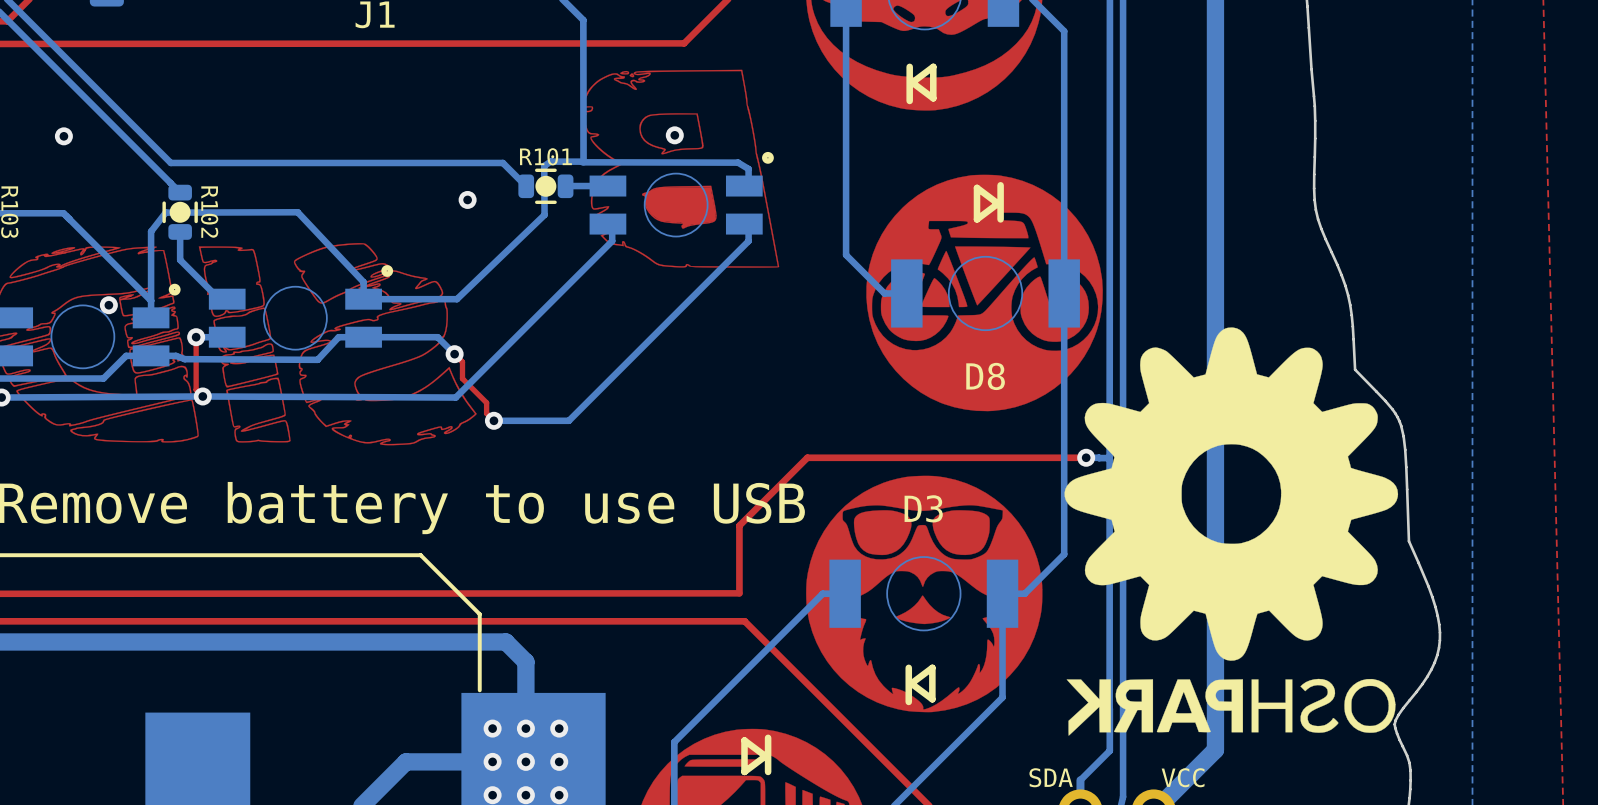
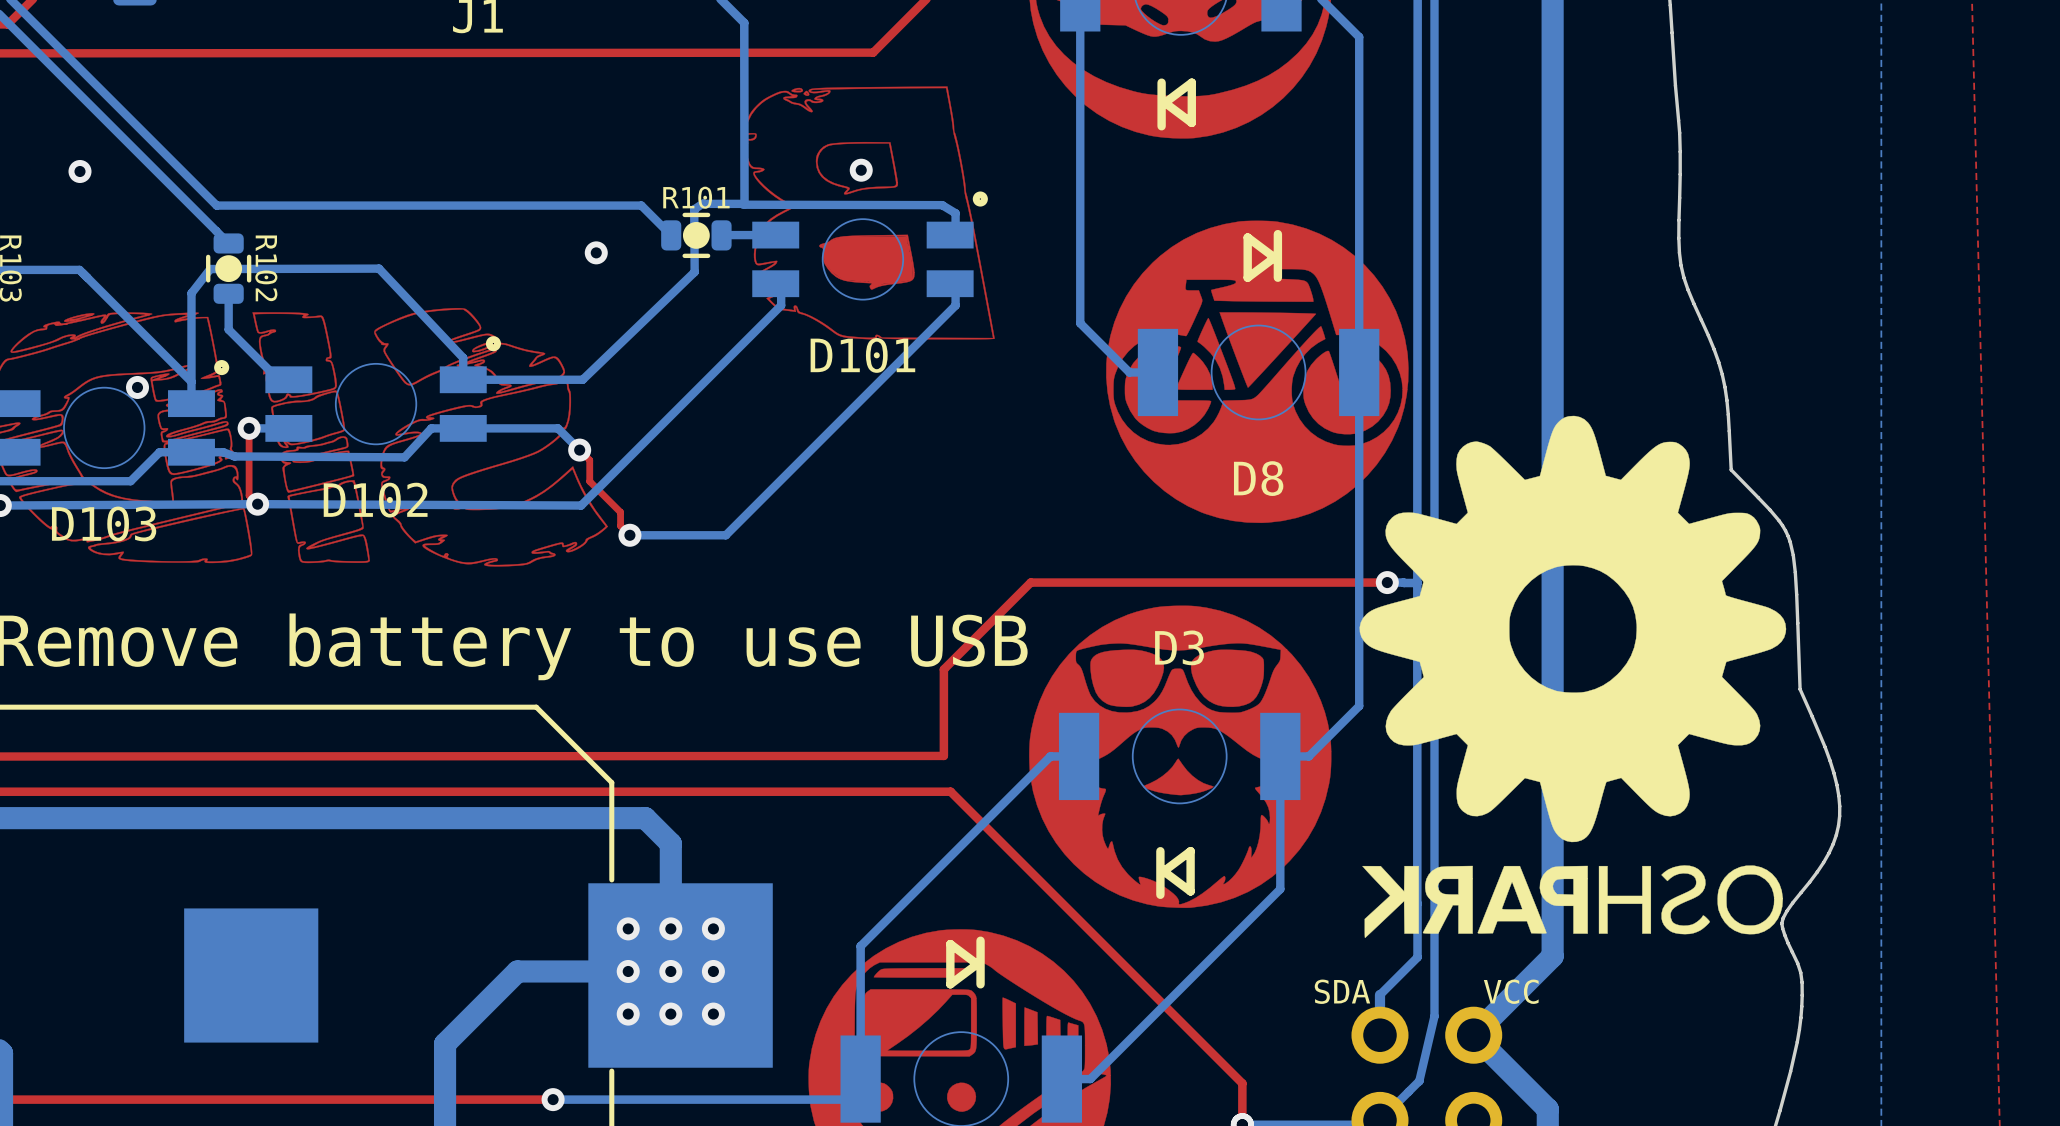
D101 name: none -> D101 (862, 355)
D102 name: none -> D102 (375, 500)
D103 name: none -> D103 (104, 523)

